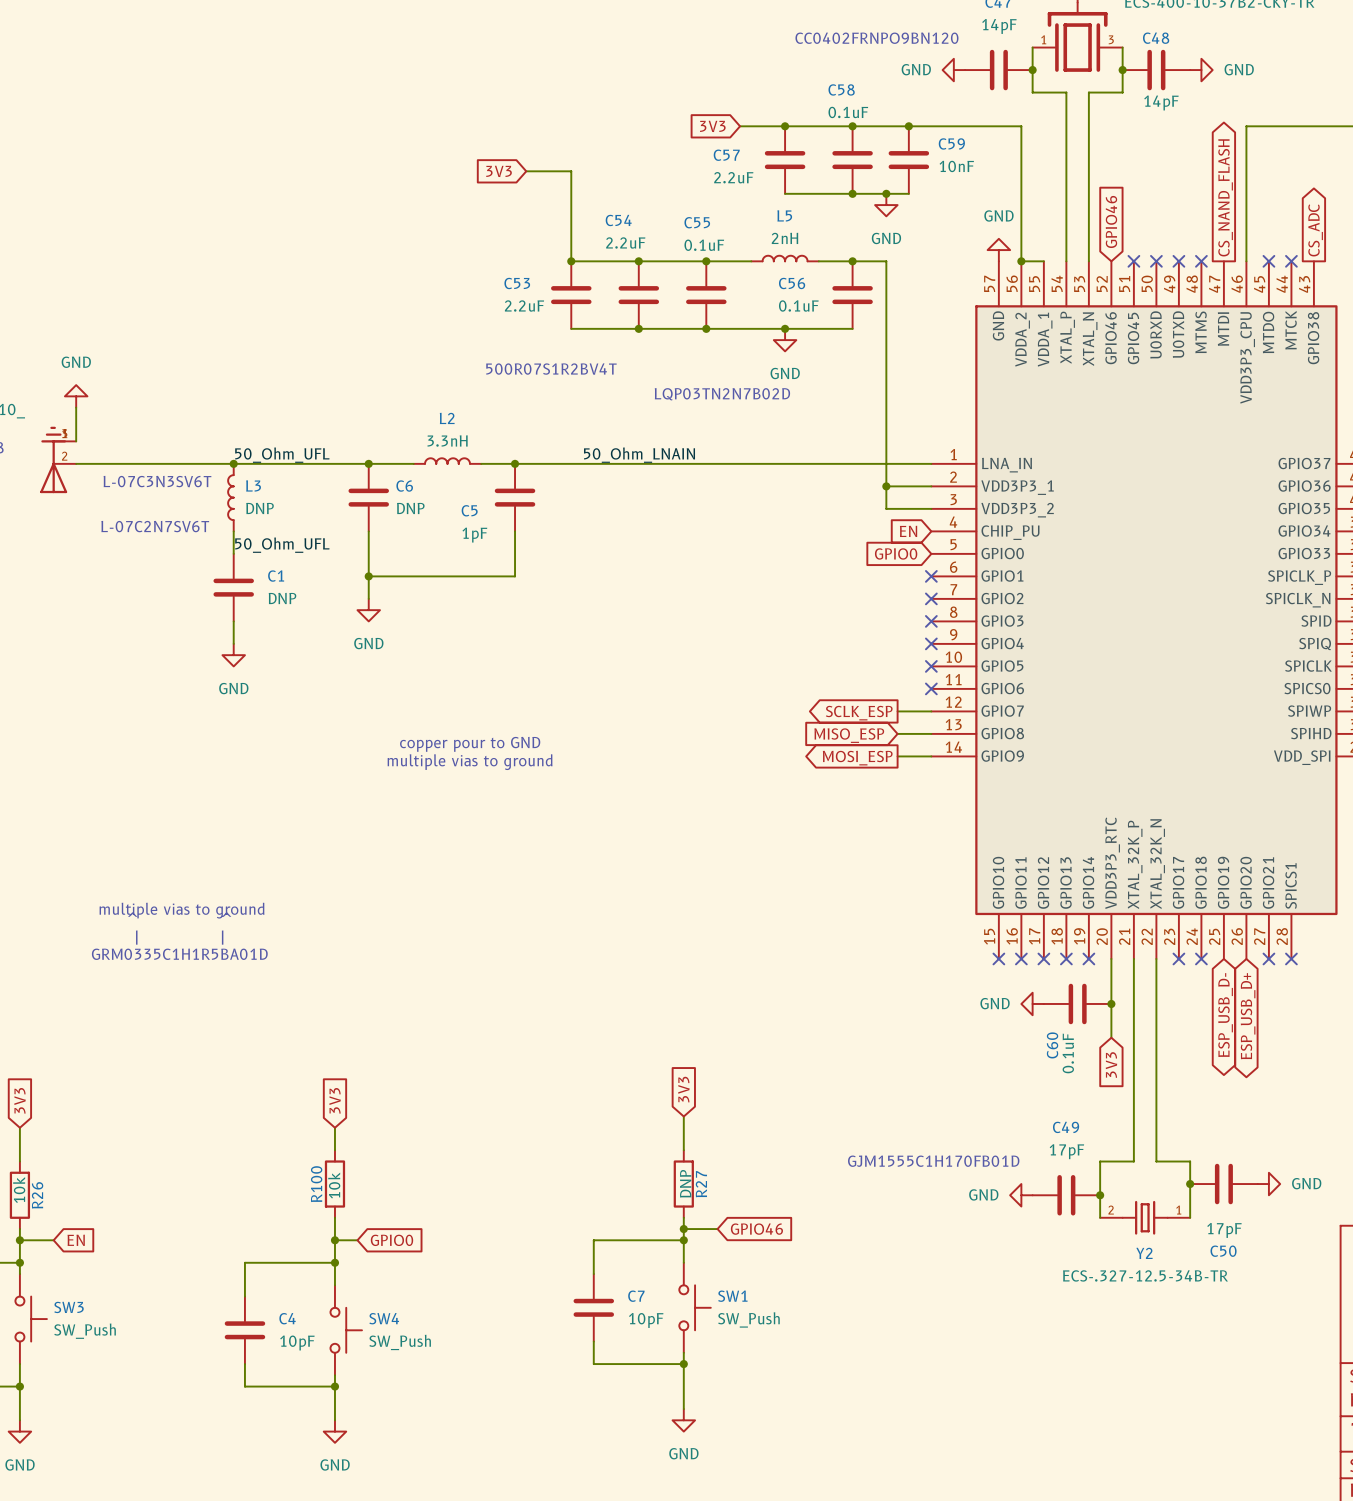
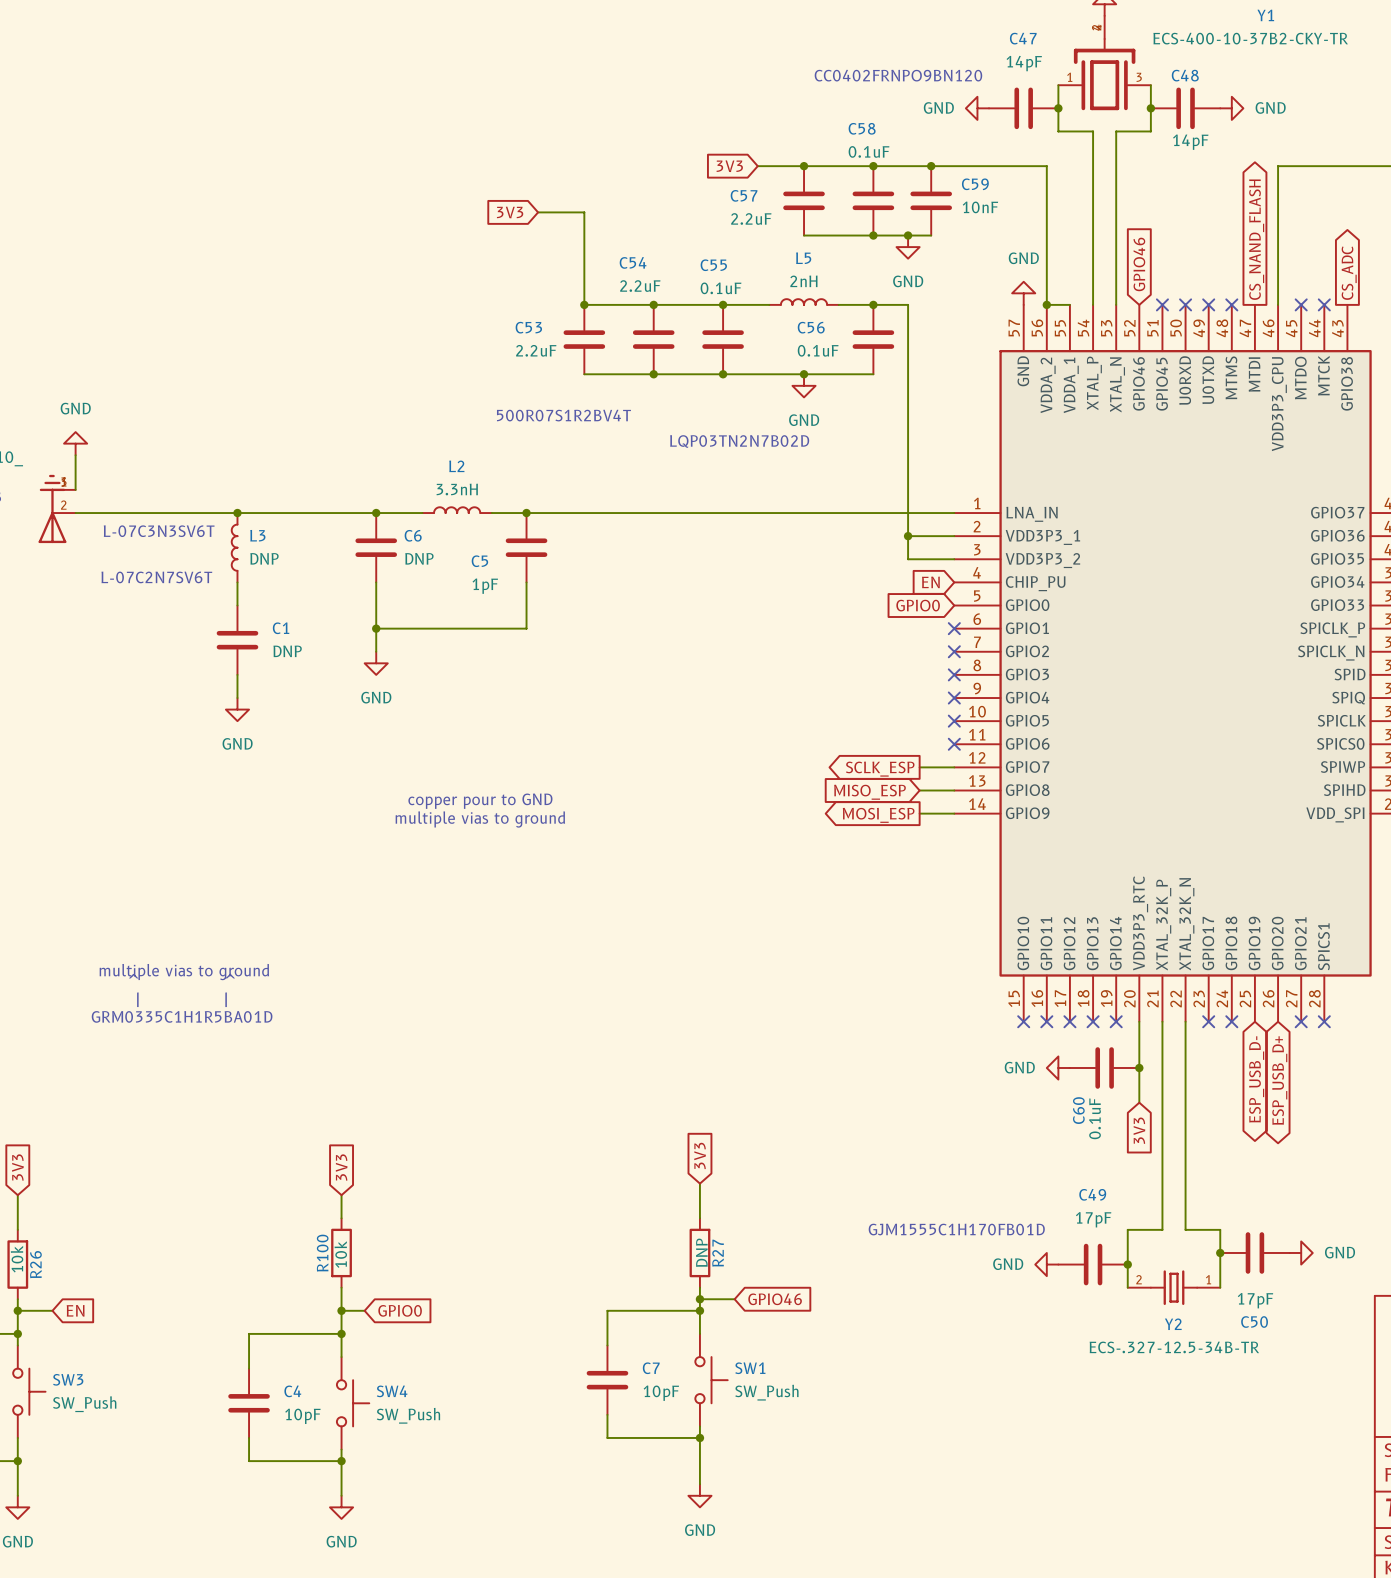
label: 50_Ohm_UFL (282, 455) -> none
label: 50_Ohm_LNAIN (639, 455) -> none
label: 50_Ohm_UFL (282, 545) -> none

